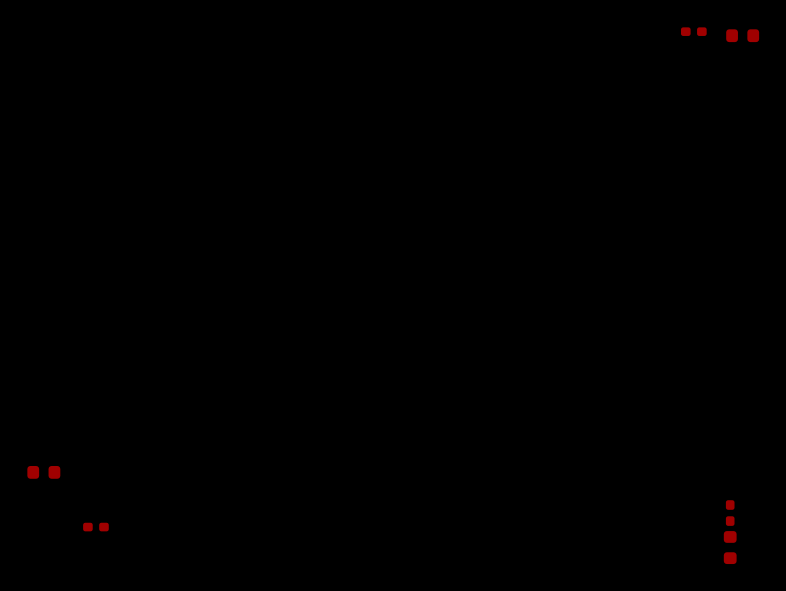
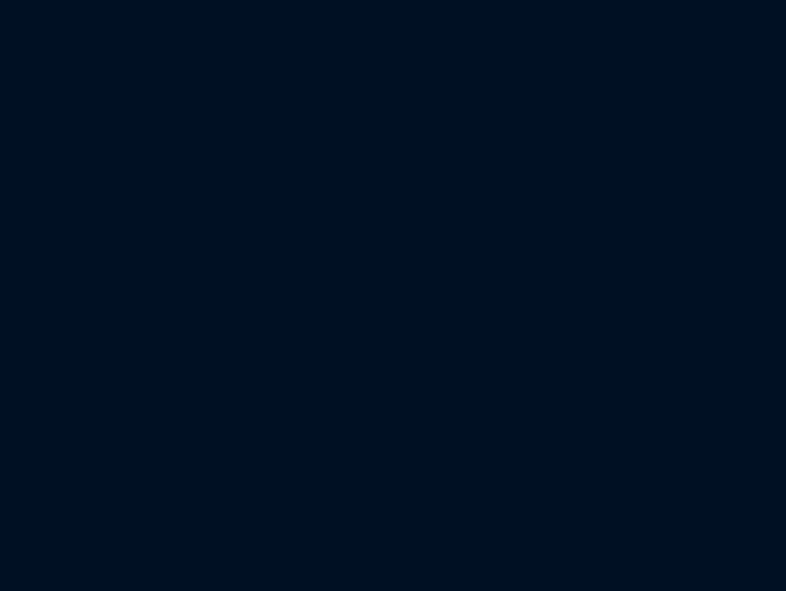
part: (693, 31) -> none
part: (742, 35) -> none
part: (43, 472) -> none
part: (730, 513) -> none
part: (95, 527) -> none
part: (730, 547) -> none

